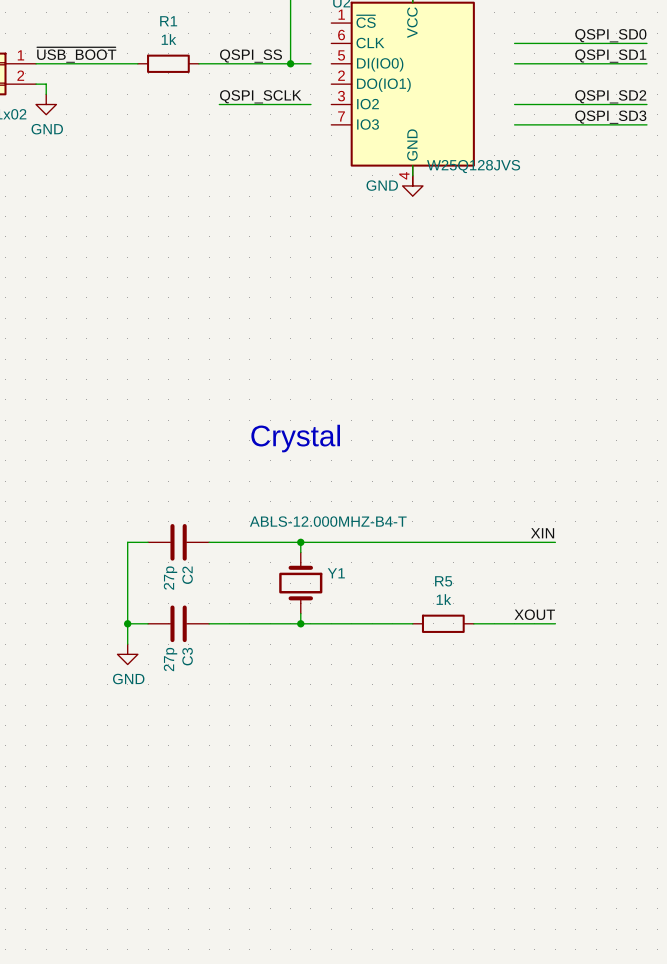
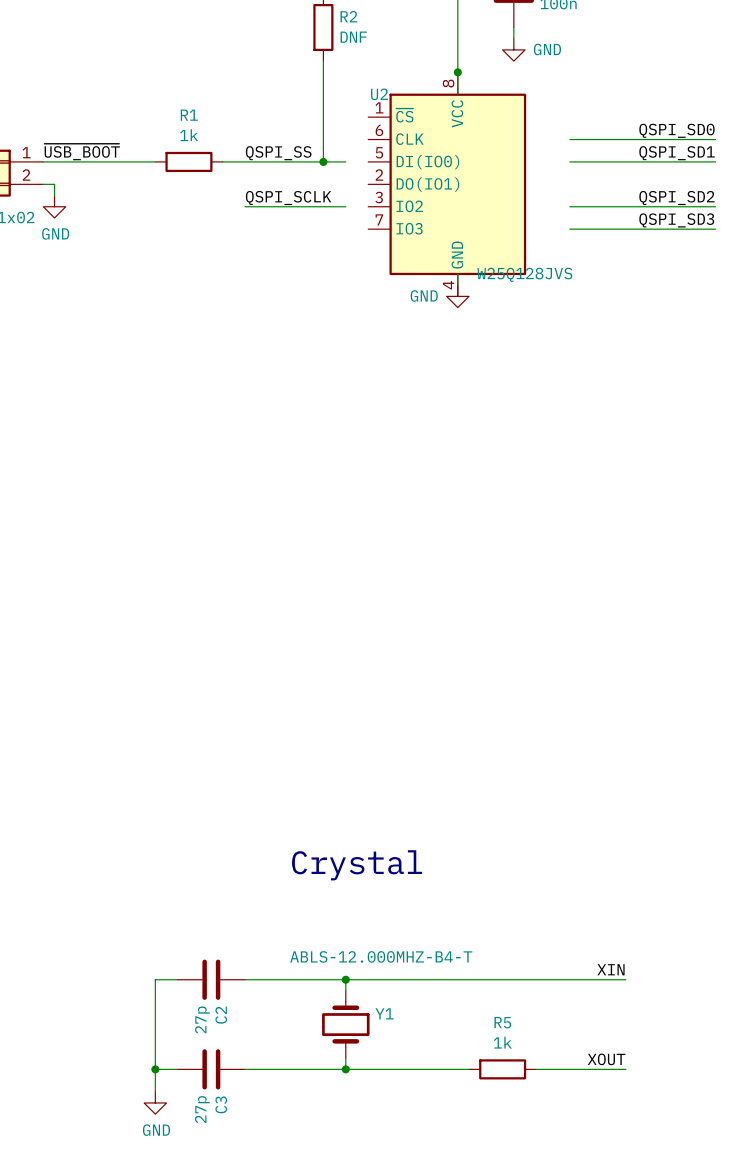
text: Crystal (295, 438) -> none
label: XIN (542, 533) -> none
wire: (148, 542) (127, 542) (127, 644) -> none
C2 position: (178, 542) -> (211, 979)
wire: (209, 542) (555, 542) -> none
wire: (300, 542) (300, 552) -> none
junction: (300, 542) -> none
Y1 position: (300, 583) -> (345, 1024)
wire: (300, 613) (300, 623) -> (345, 979) (345, 990)
label: XOUT (534, 614) -> none
wire: (127, 623) (148, 623) -> none
junction: (127, 623) -> none
C3 position: (178, 623) -> (211, 1069)
wire: (209, 623) (412, 623) -> none
junction: (300, 623) -> none
R5 position: (443, 623) -> (502, 1069)
wire: (473, 623) (555, 623) -> none
power symbol: GND (127, 654) -> none
text: none -> Crystal (357, 865)
label: none -> XIN (610, 969)
wire: none -> (177, 979) (155, 979) (155, 1091)
wire: none -> (244, 979) (625, 979)
junction: none -> (345, 979)
wire: none -> (345, 1058) (345, 1069)
label: none -> XOUT (606, 1059)
wire: none -> (155, 1069) (177, 1069)
junction: none -> (155, 1069)
wire: none -> (244, 1069) (469, 1069)
junction: none -> (345, 1069)
wire: none -> (536, 1069) (625, 1069)
power symbol: none -> GND (155, 1102)

